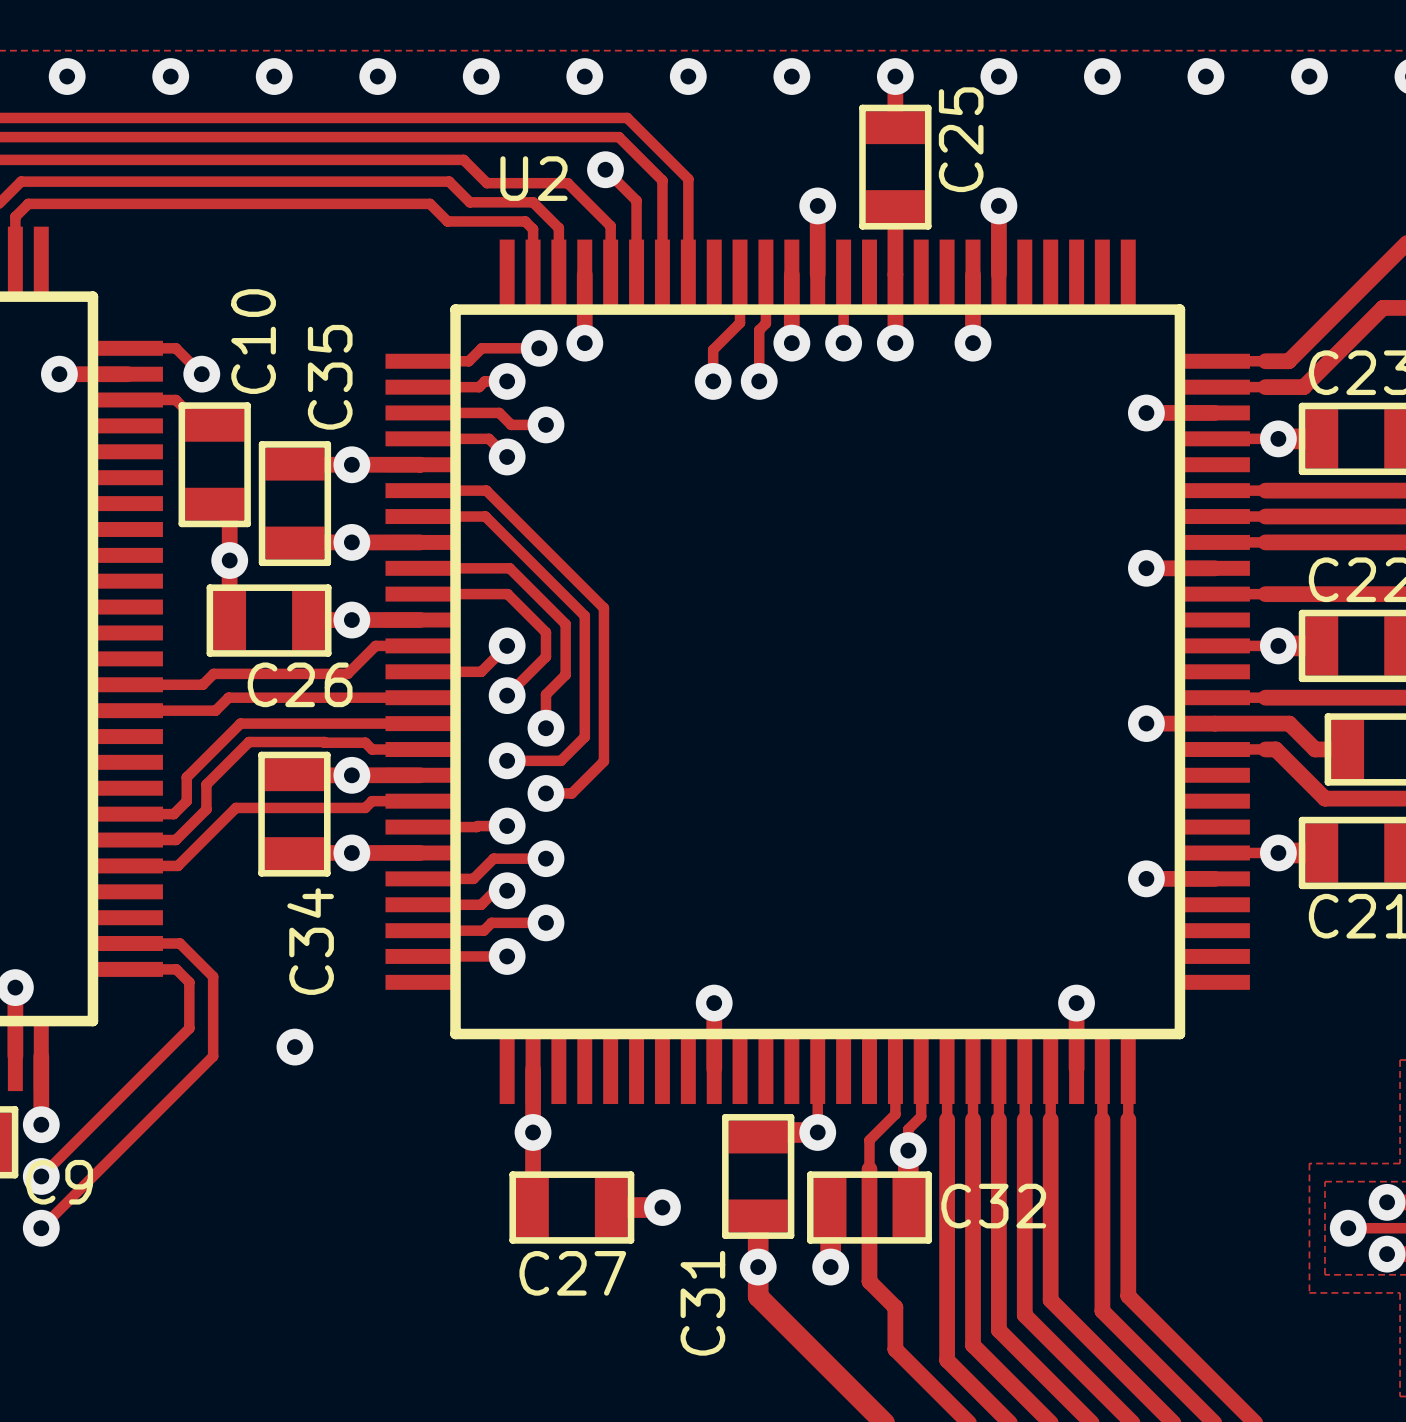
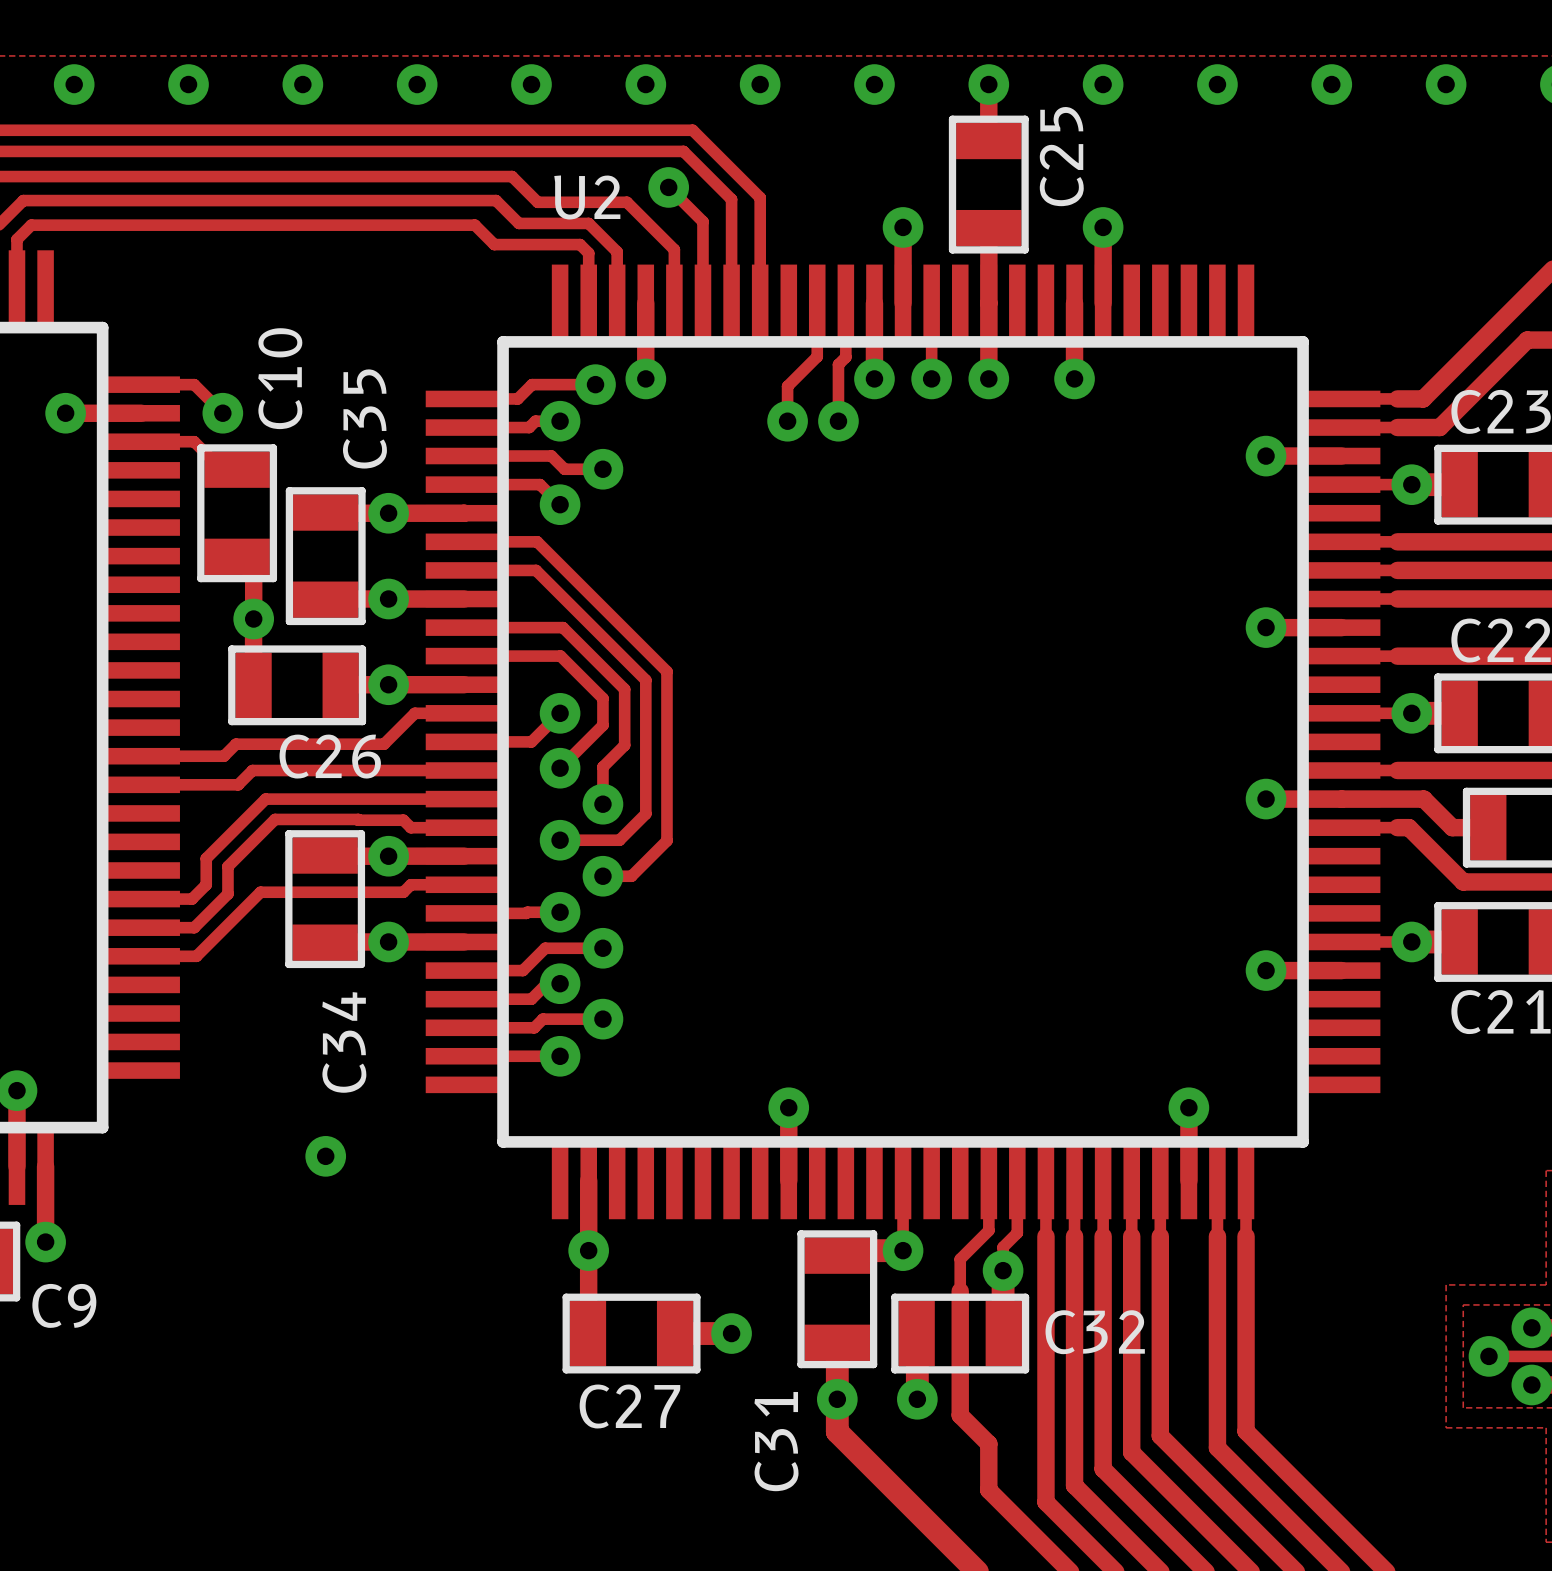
track: (128, 943) (179, 943) (213, 976) (213, 1056) (41, 1228) -> none
track: (128, 969) (176, 969) (189, 982) (189, 1028) (41, 1176) -> none
via: (41, 1176) -> none
via: (41, 1228) -> none

